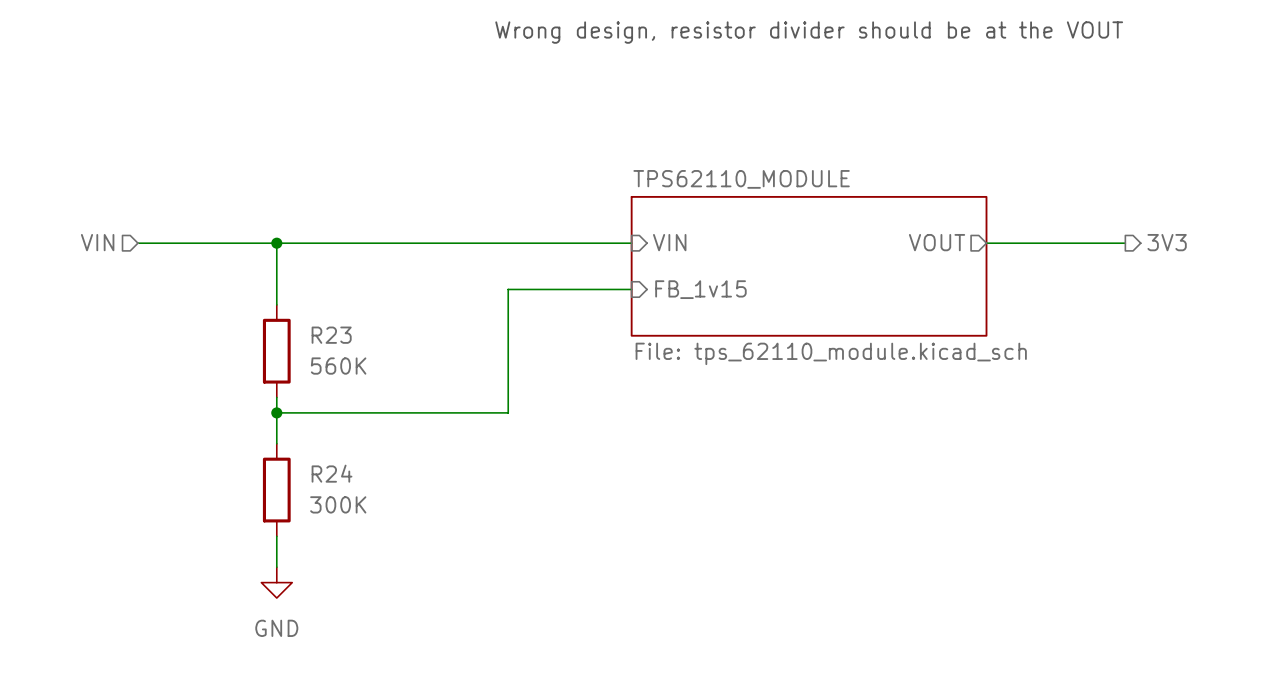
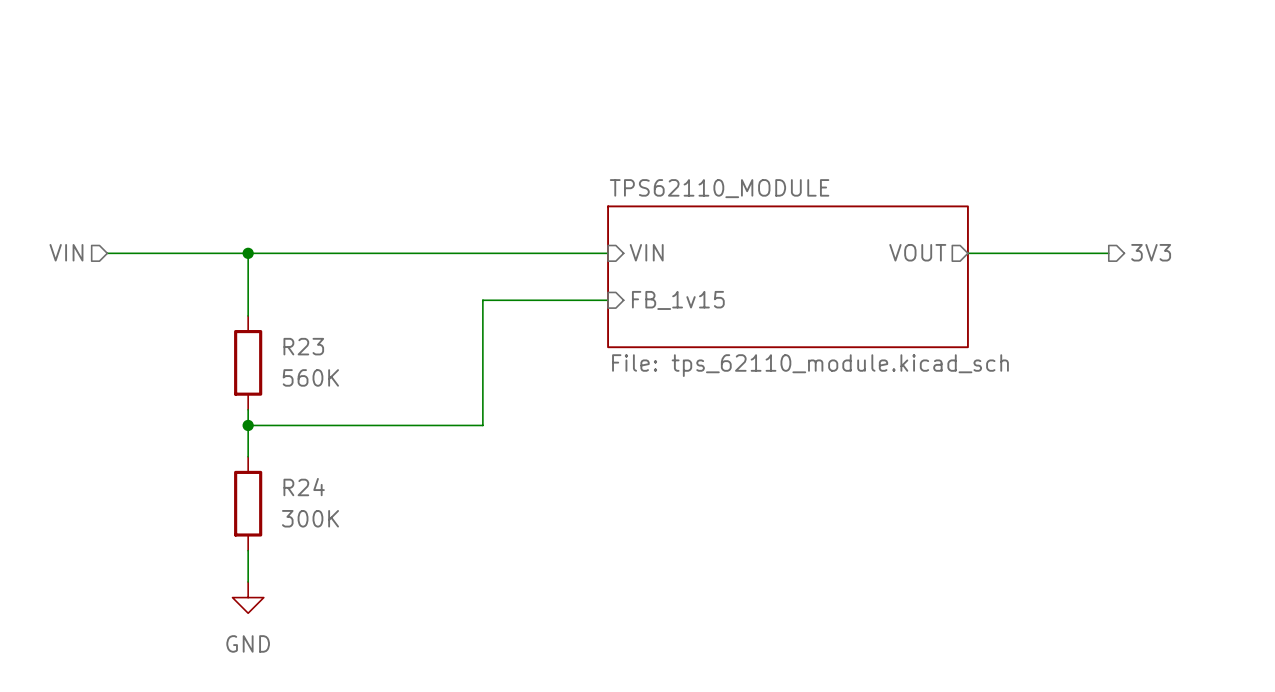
text: Wrong design, resistor divider should be at the VOUT (809, 32) -> none

